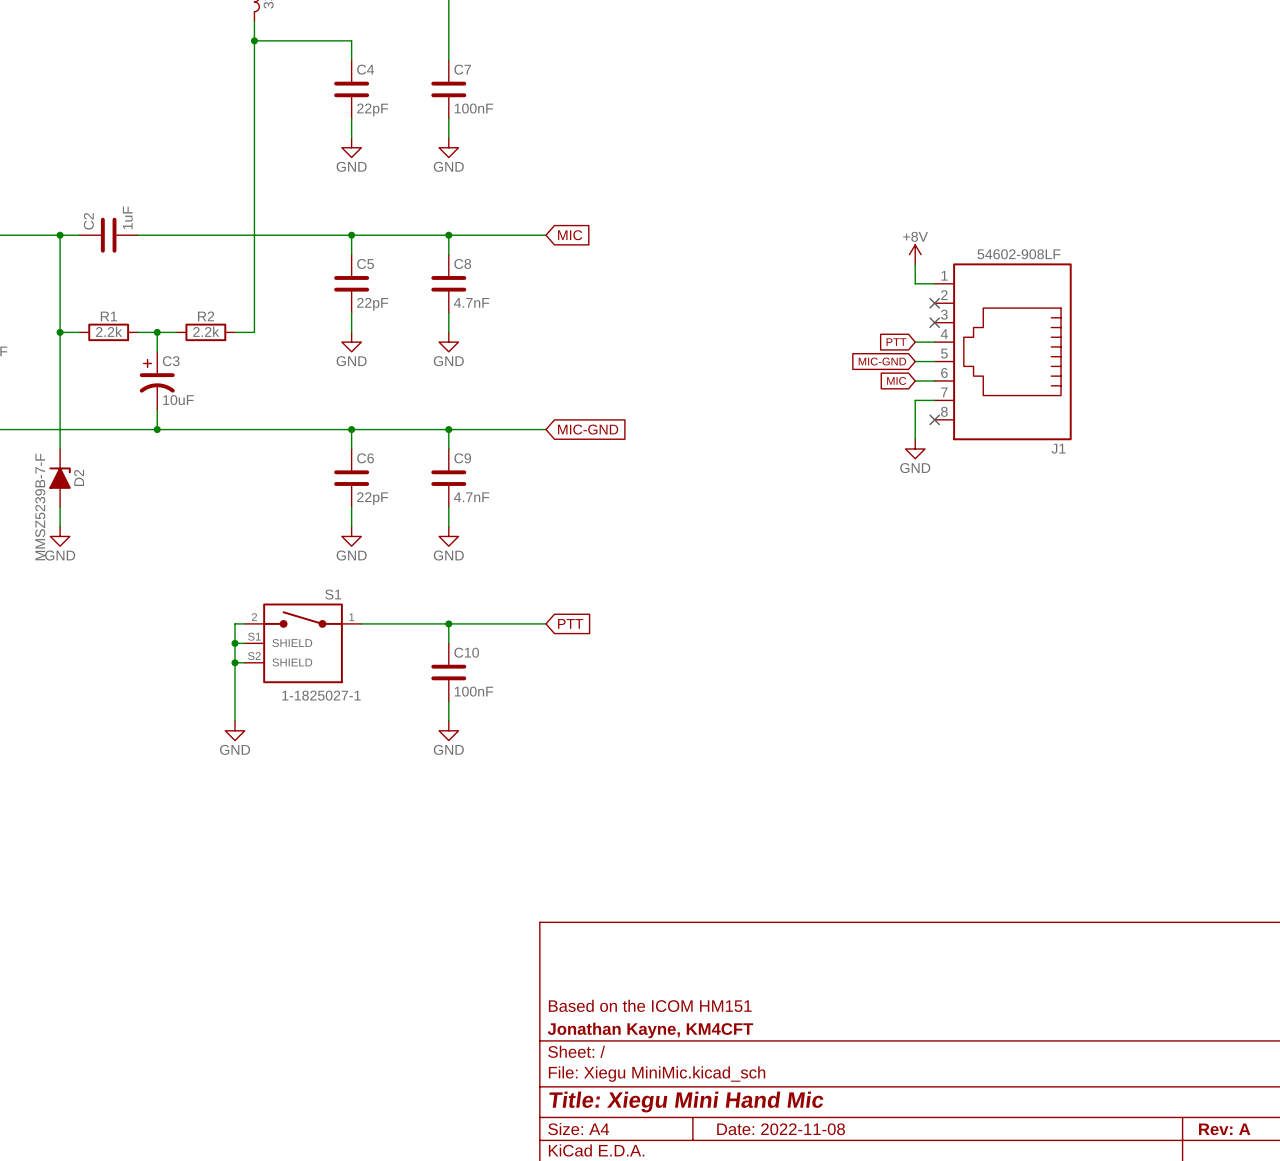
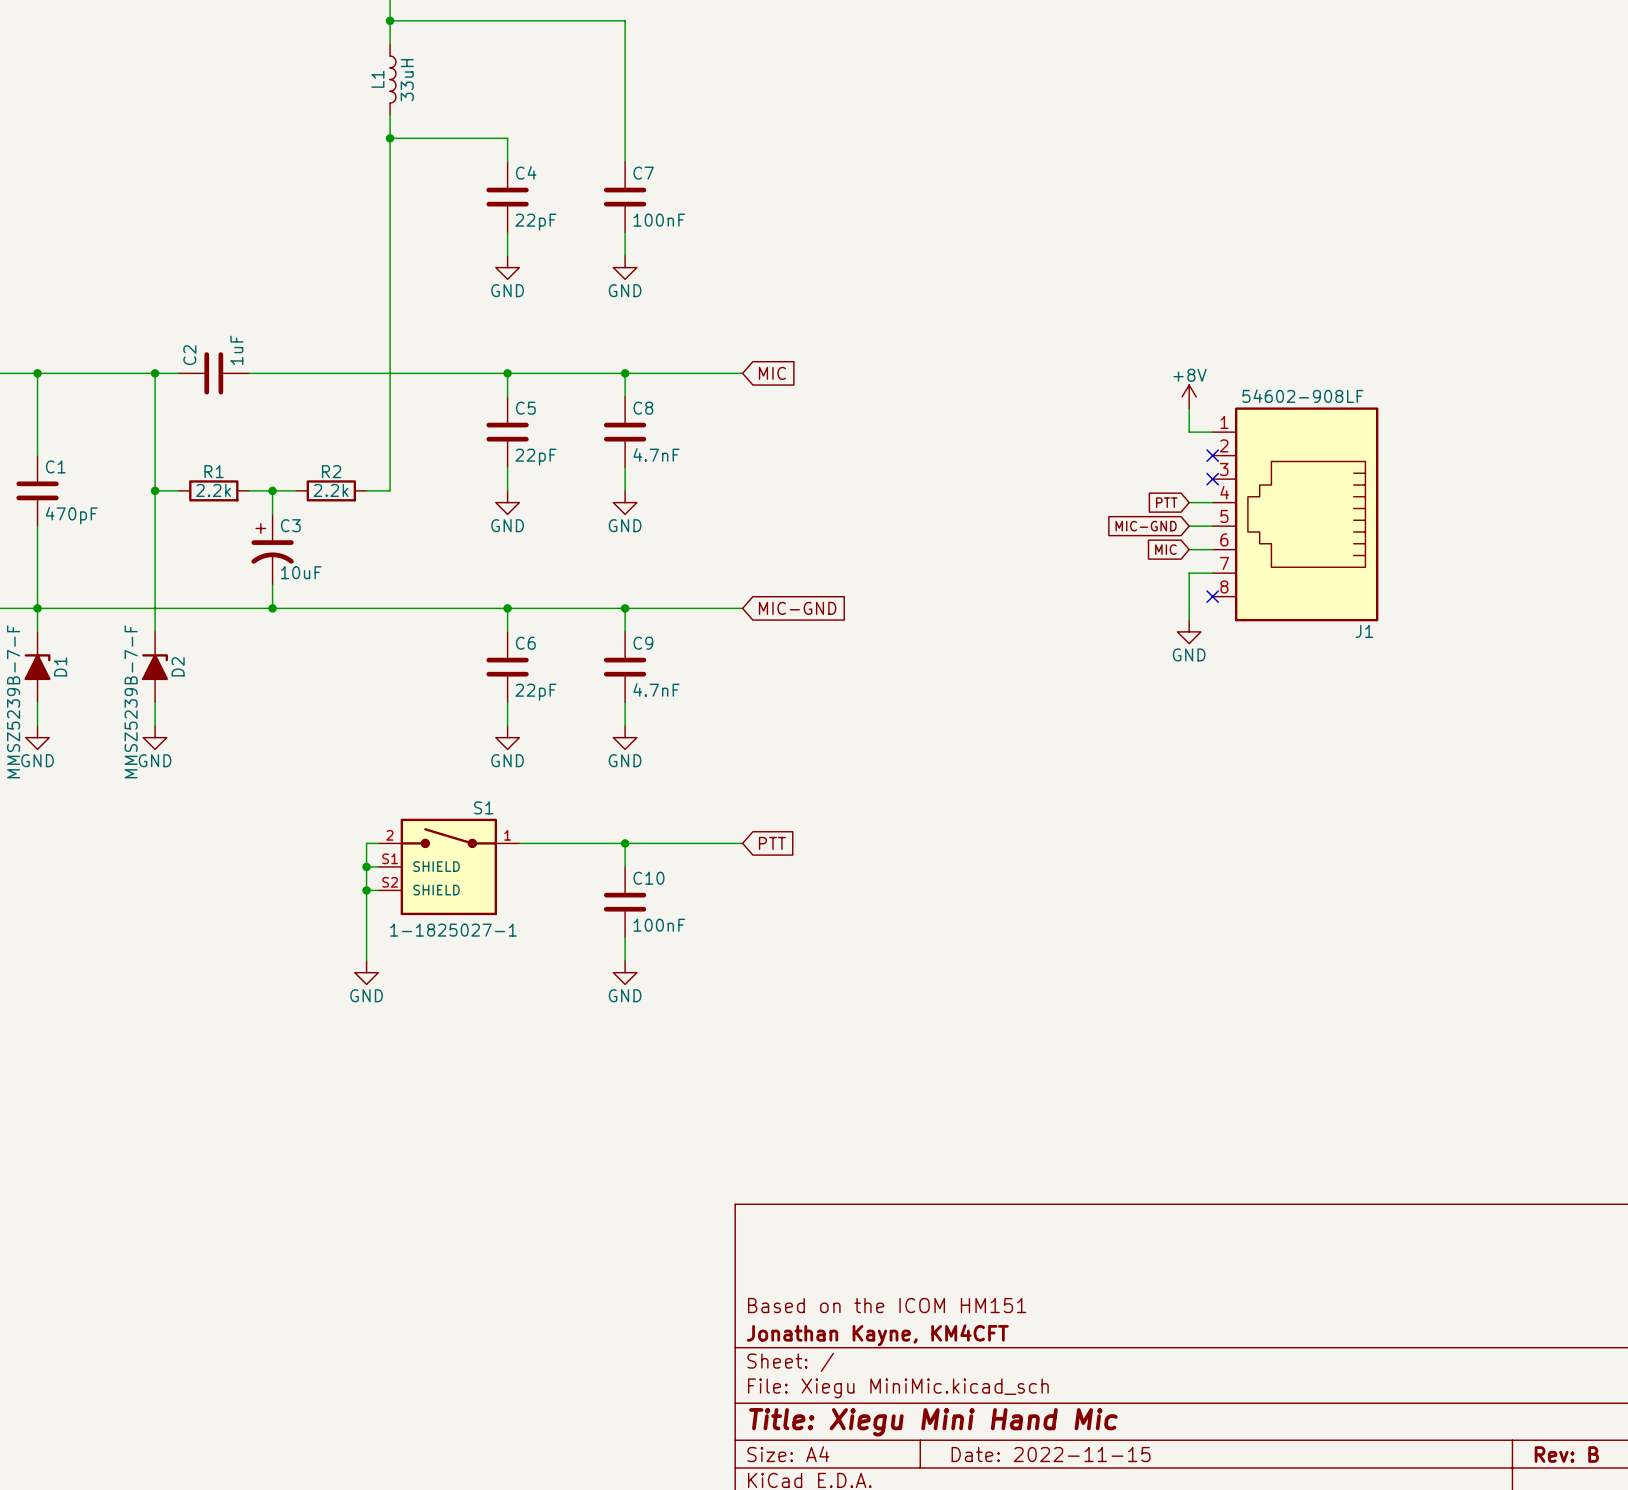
title block: Date: 2022-11-08 (781, 1129) -> Date: 2022-11-15 (1051, 1454)
title block: Rev: A (1224, 1129) -> Rev: B (1566, 1454)

